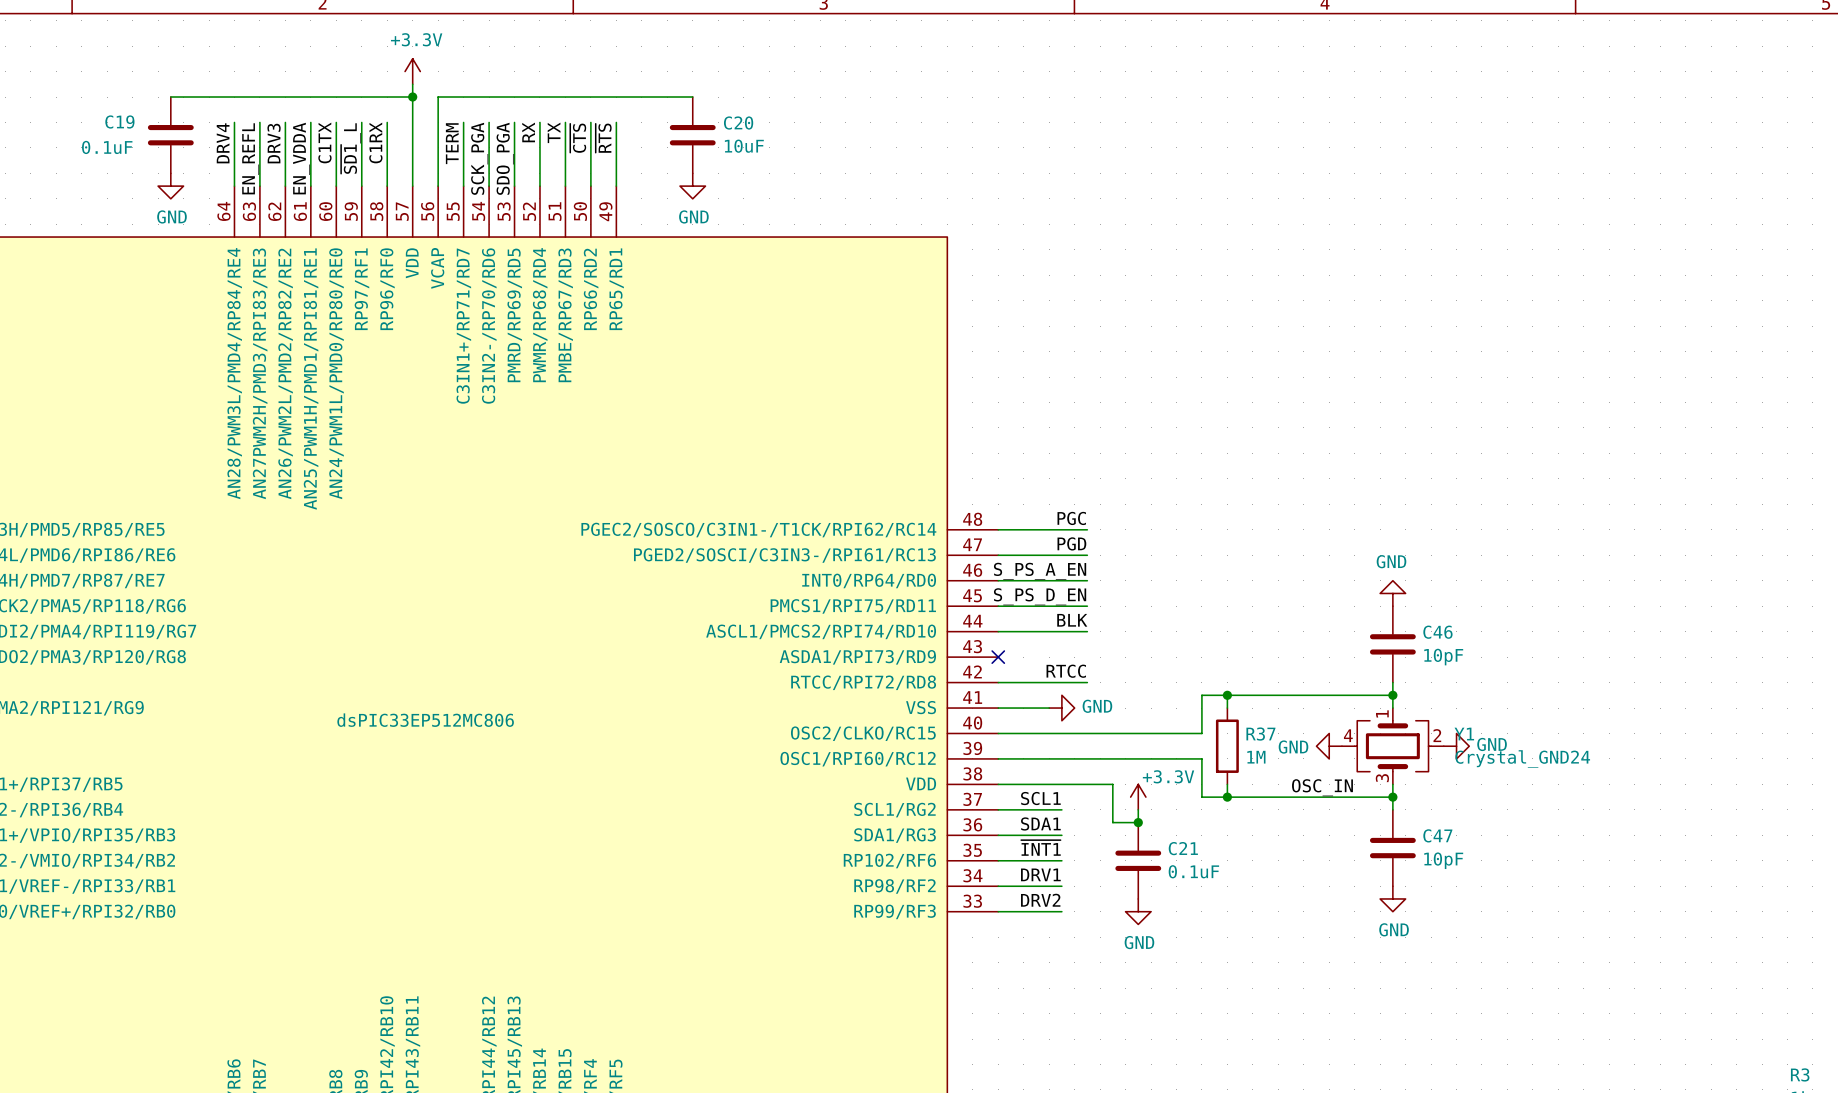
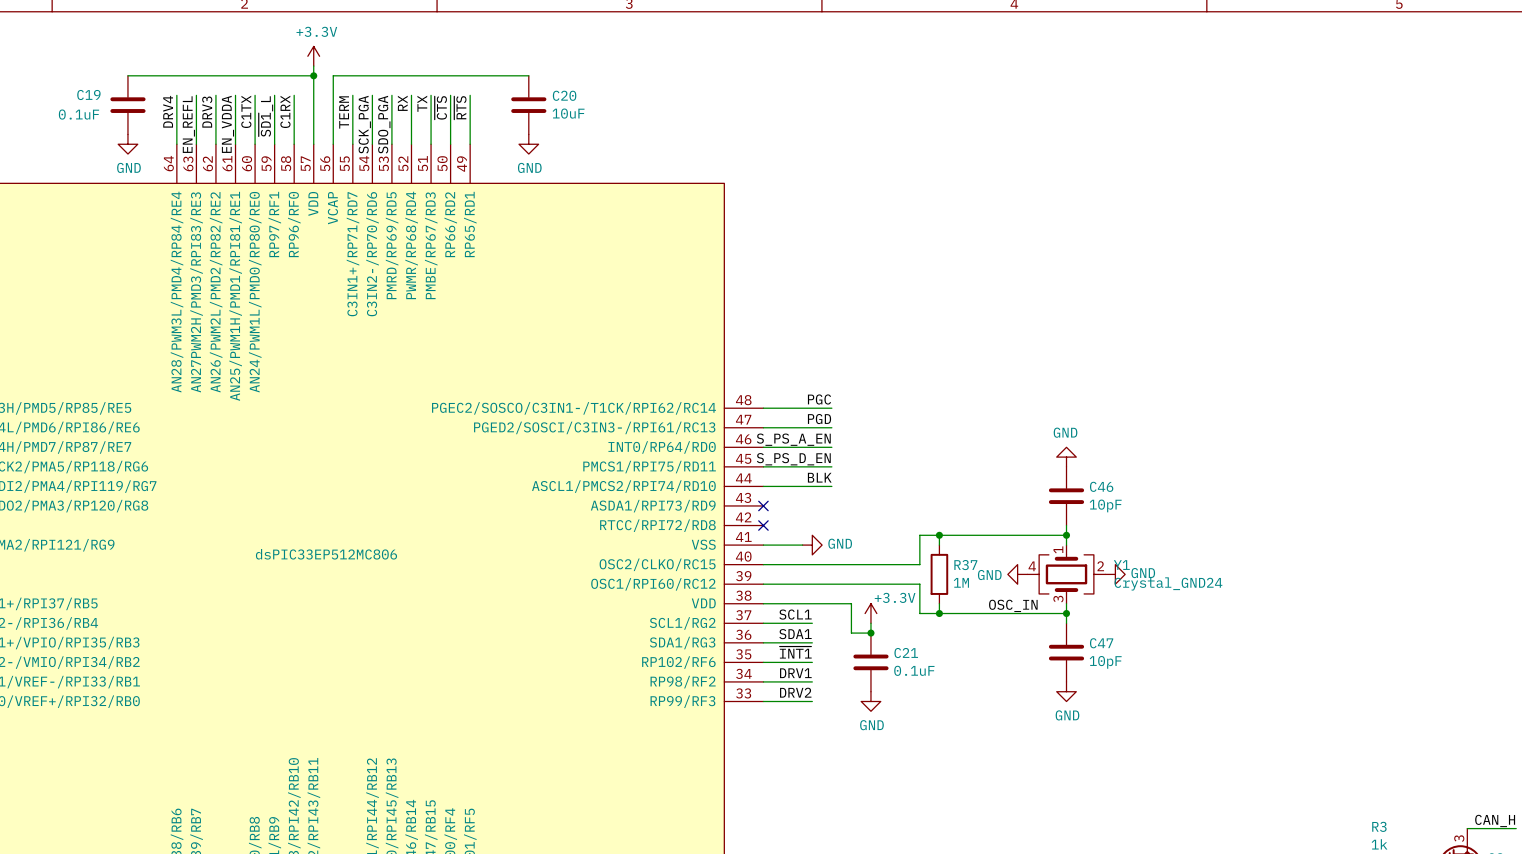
label: RTCC (1066, 671) -> none
wire: (998, 682) (1087, 682) -> none
no-connect mark: none -> (763, 525)

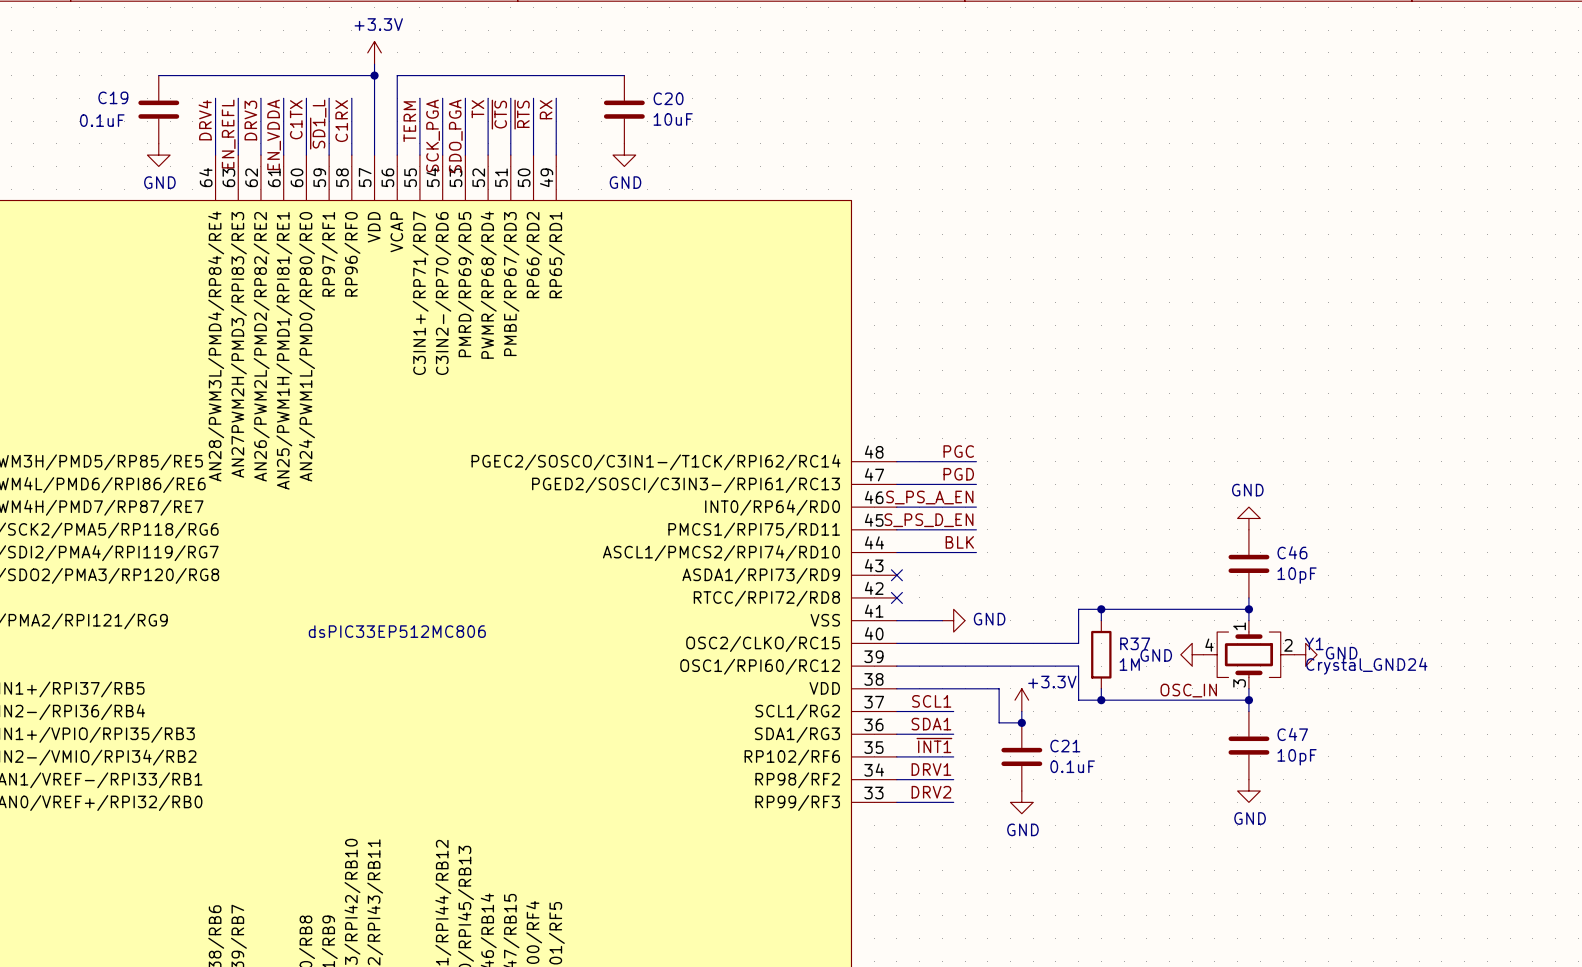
label: RX (402, 103) -> TX (477, 109)
label: TX (422, 103) -> ~{CTS} (499, 114)
label: ~{CTS} (440, 107) -> ~{RTS} (522, 114)
label: ~{RTS} (460, 107) -> RX (546, 109)

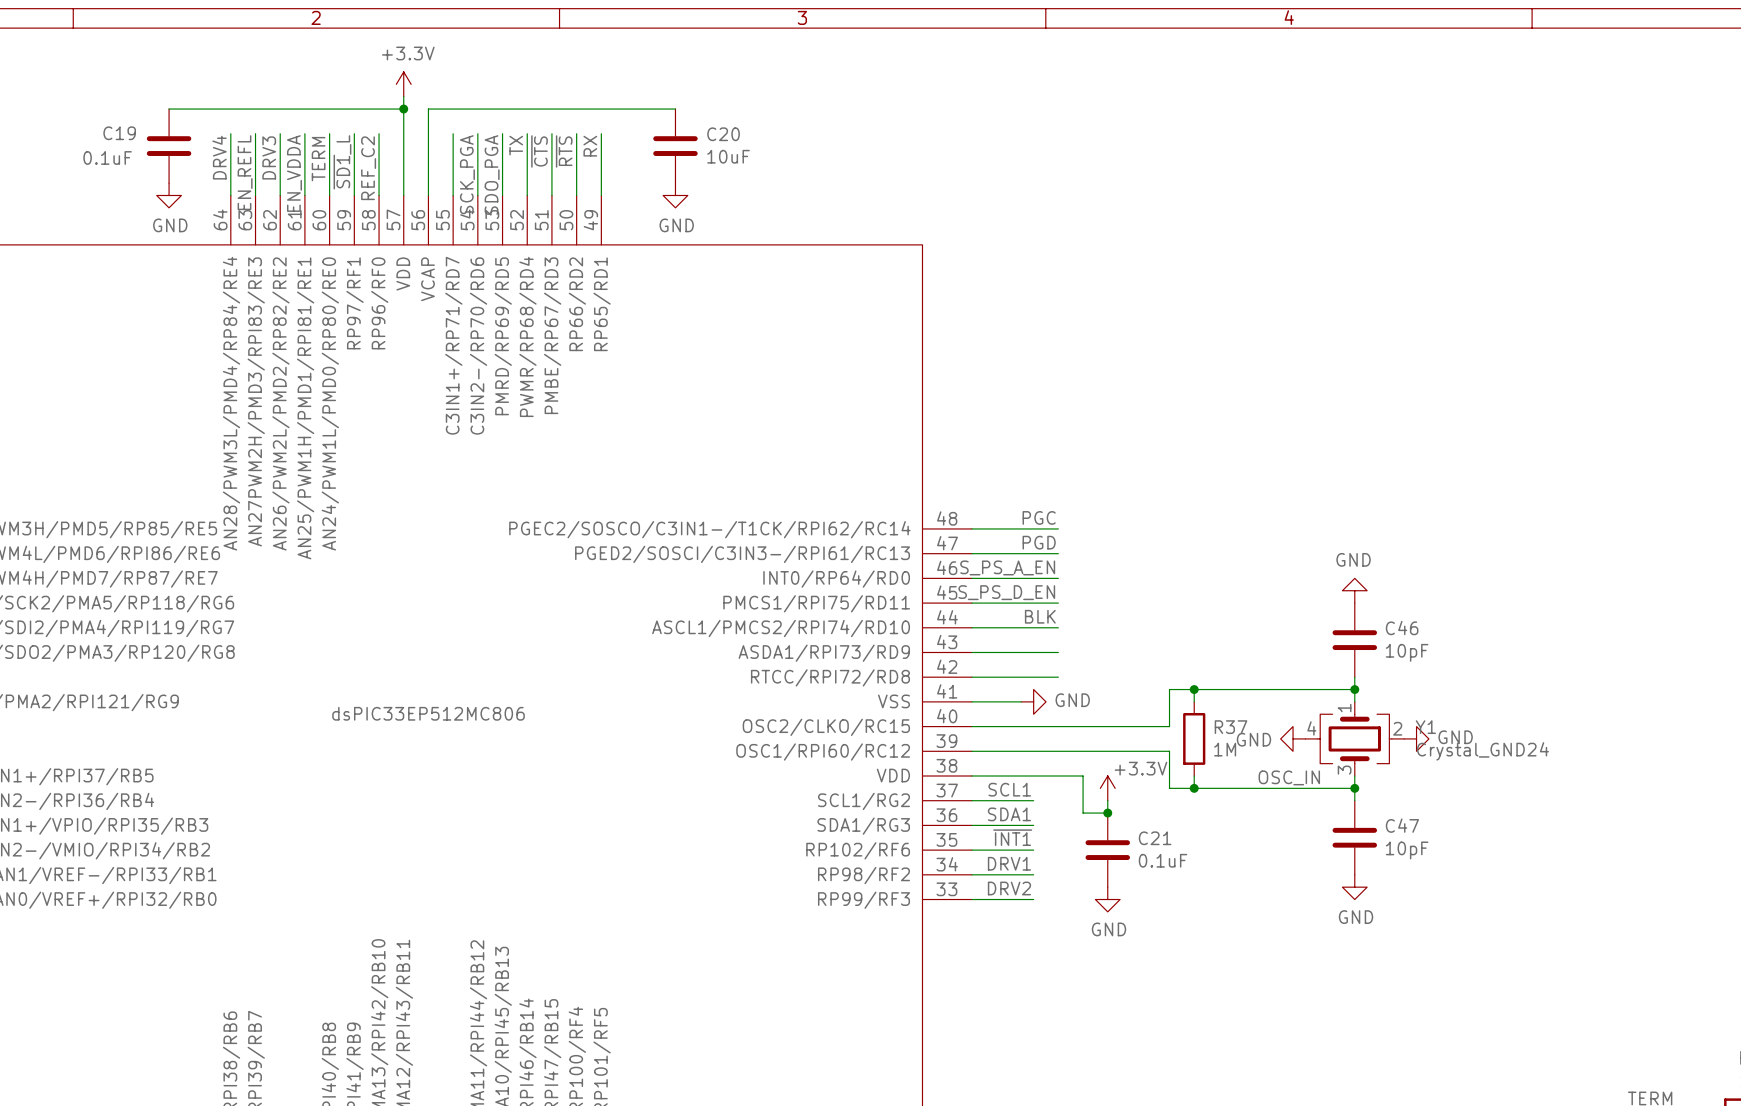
label: C1TX (296, 119) -> TERM (318, 159)
label: C1RX (341, 121) -> REF_C2 (368, 168)
label: TERM (409, 121) -> none
wire: none -> (971, 652) (1058, 652)
no-connect mark: (896, 575) -> none
wire: none -> (971, 677) (1058, 677)
no-connect mark: (896, 597) -> none

